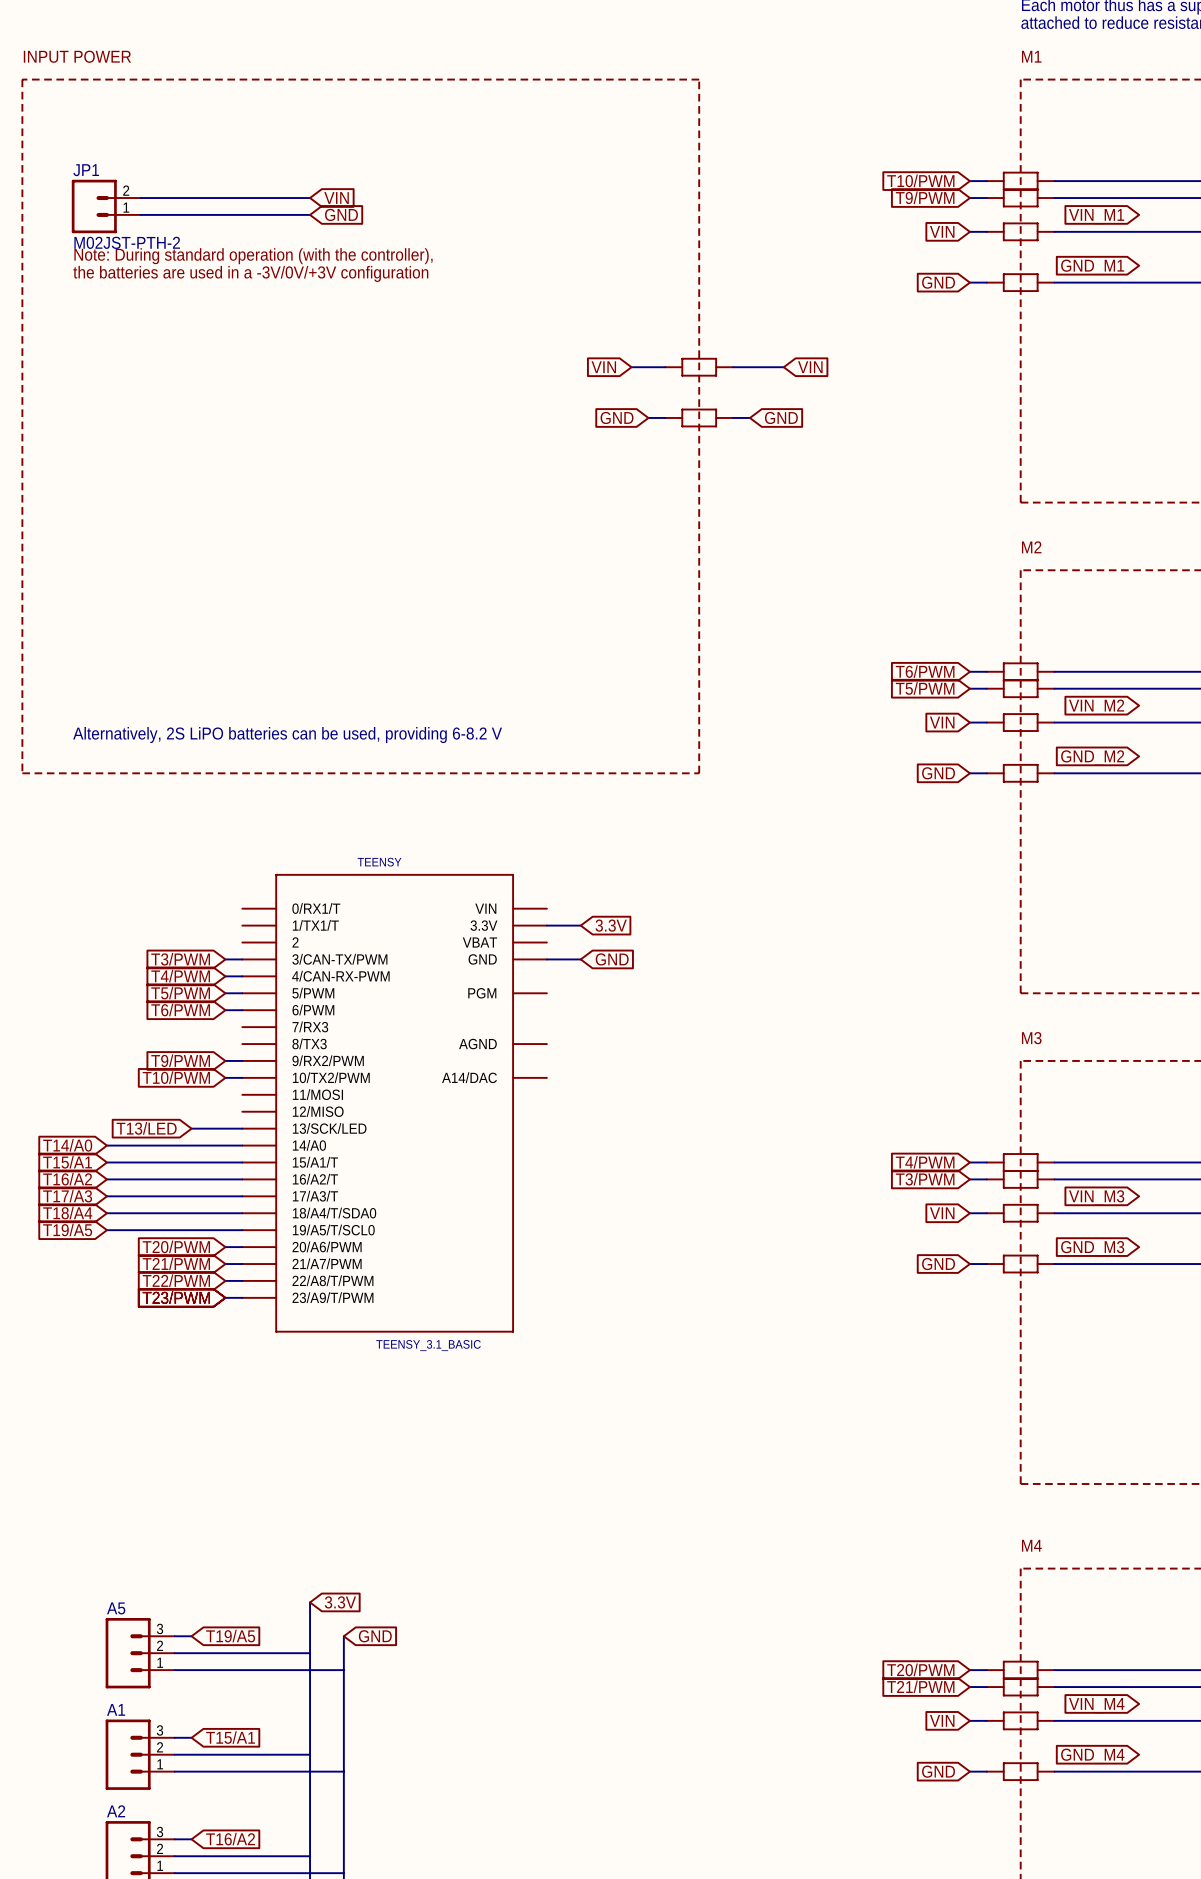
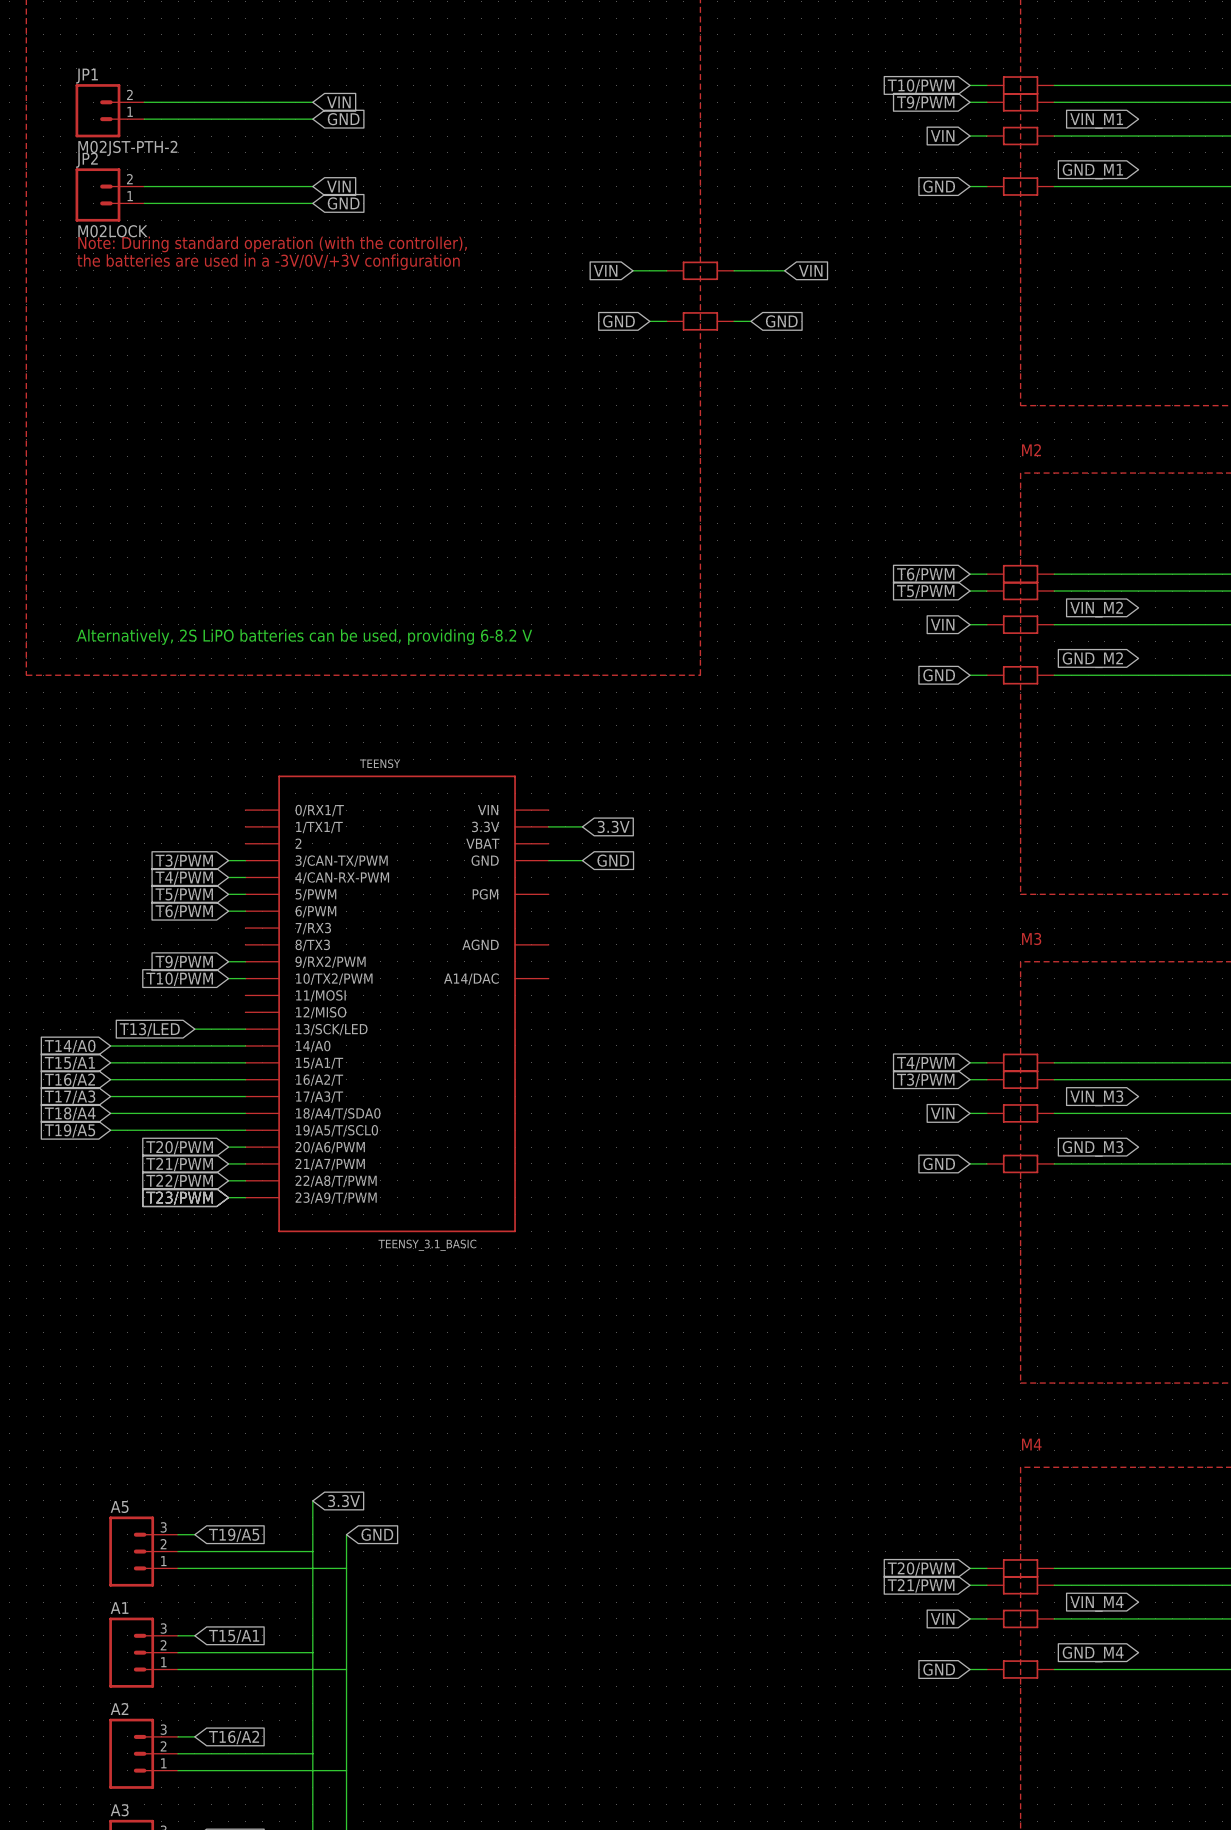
text position: Note: During standard operation (with the controller), (253, 256) -> Note: During standard operation (with the controller), (272, 244)
text position: the batteries are used in a -3V/0V/+3V configuration (250, 273) -> the batteries are used in a -3V/0V/+3V configuration (268, 262)
wire: none -> (144, 186) (312, 186)
global label: none -> VIN (338, 186)
JP2: none -> M02LOCK (109, 194)
wire: none -> (144, 203) (312, 203)
global label: none -> GND (343, 203)

